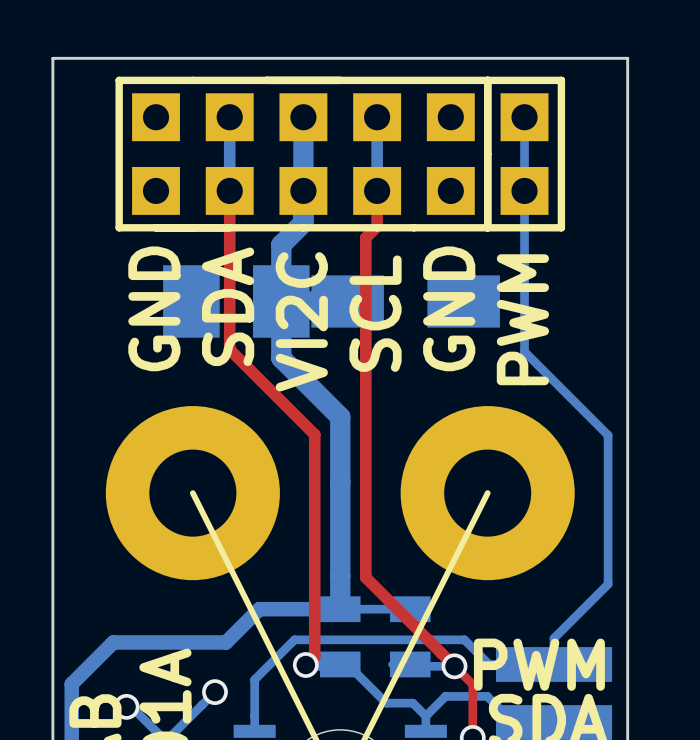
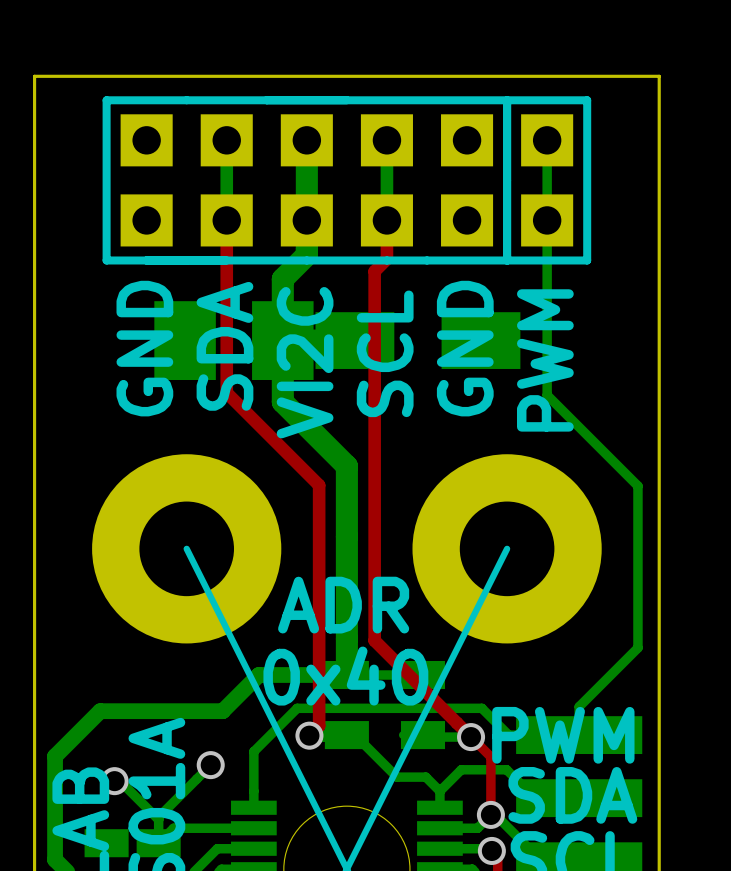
text: none -> ADR (343, 605)
text: none -> 0x40 (345, 676)

